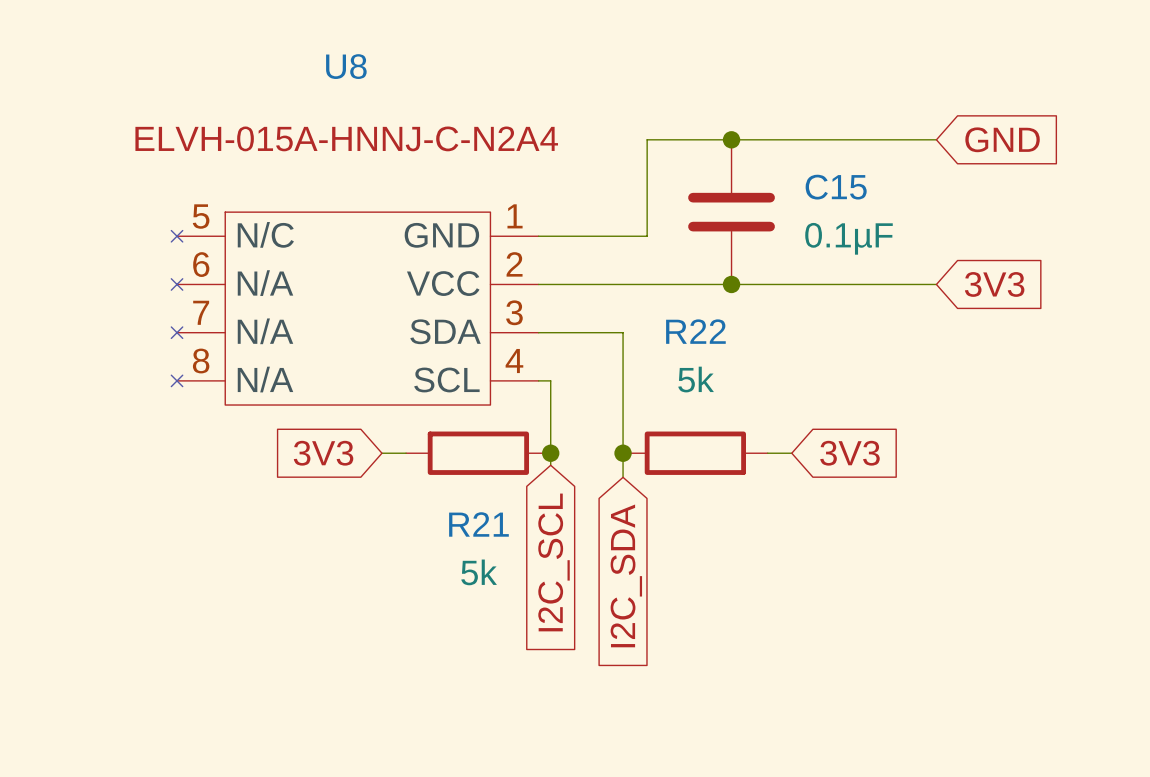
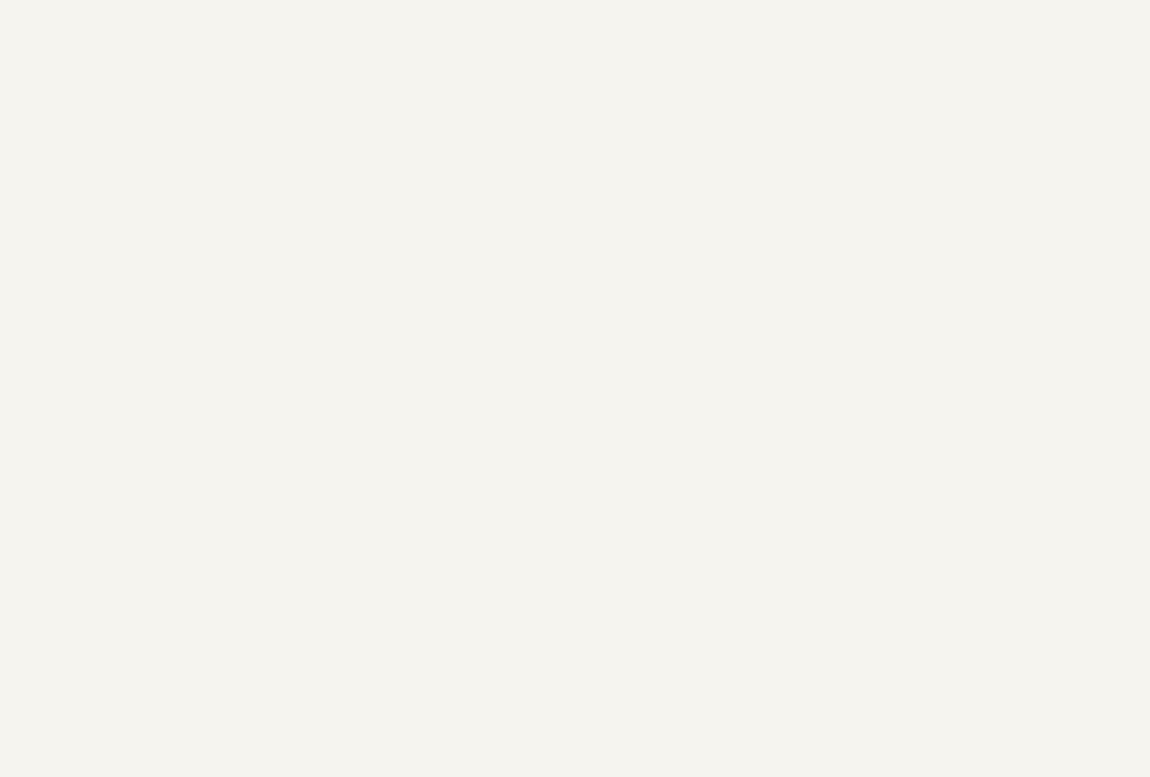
junction: (731, 139) -> none
wire: (936, 139) (647, 139) (647, 236) (538, 236) -> none
global label: GND (1002, 139) -> none
C15: 0.1µF (731, 212) -> none
wire: (538, 284) (936, 284) -> none
junction: (731, 284) -> none
global label: 3V3 (994, 284) -> none
U8: (354, 308) -> none
wire: (538, 332) (623, 332) (623, 477) -> none
wire: (538, 380) (550, 380) (550, 465) -> none
global label: 3V3 (323, 453) -> none
wire: (381, 453) (406, 453) -> none
R21: 5k (478, 453) -> none
junction: (550, 453) -> none
junction: (623, 453) -> none
R22: 5k (695, 453) -> none
wire: (767, 453) (791, 453) -> none
global label: 3V3 (850, 453) -> none
global label: I2C_SCL (554, 562) -> none
global label: I2C_SDA (626, 575) -> none

